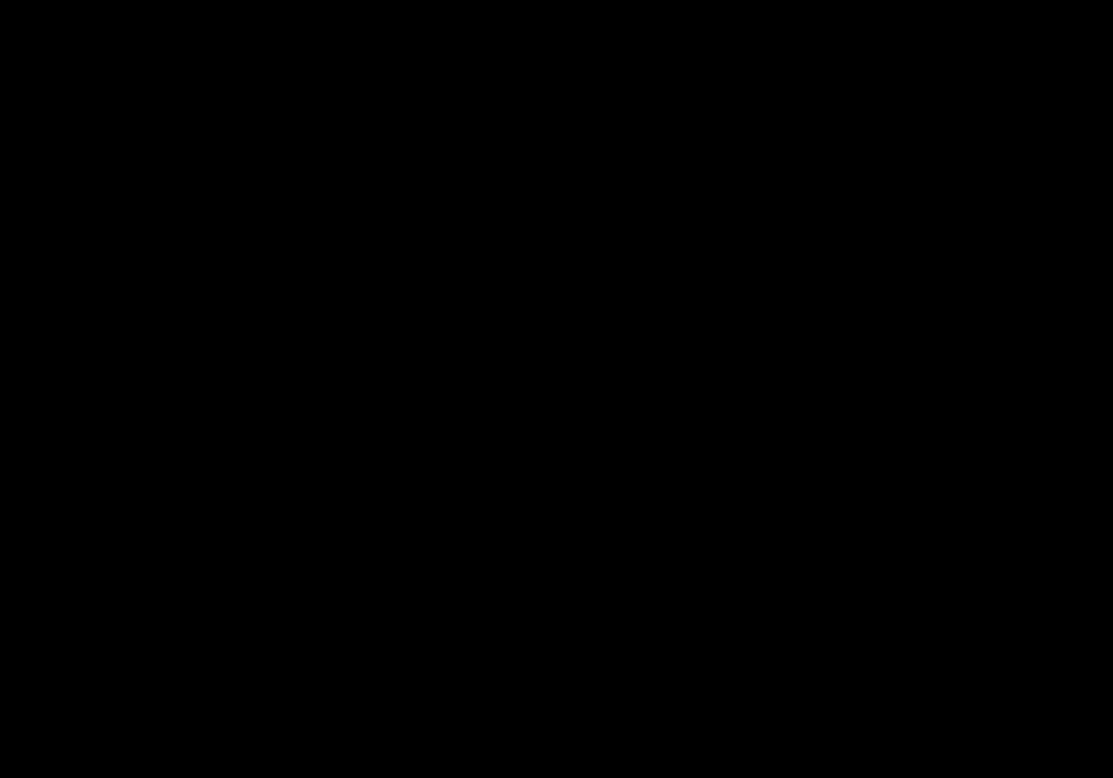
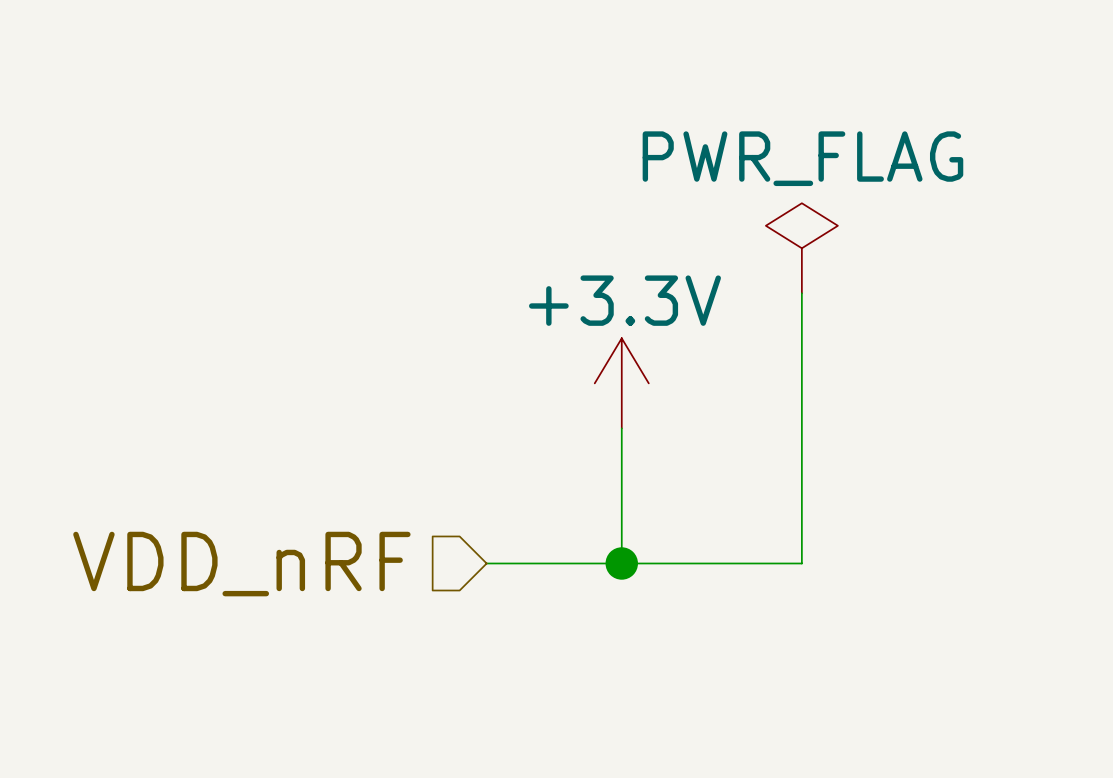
power symbol: none -> PWR_FLAG (801, 248)
wire: none -> (801, 293) (801, 563) (486, 563)
power symbol: none -> +3.3V (621, 383)
wire: none -> (621, 428) (621, 563)
junction: none -> (621, 563)
hierarchical label: none -> VDD_nRF (241, 564)

